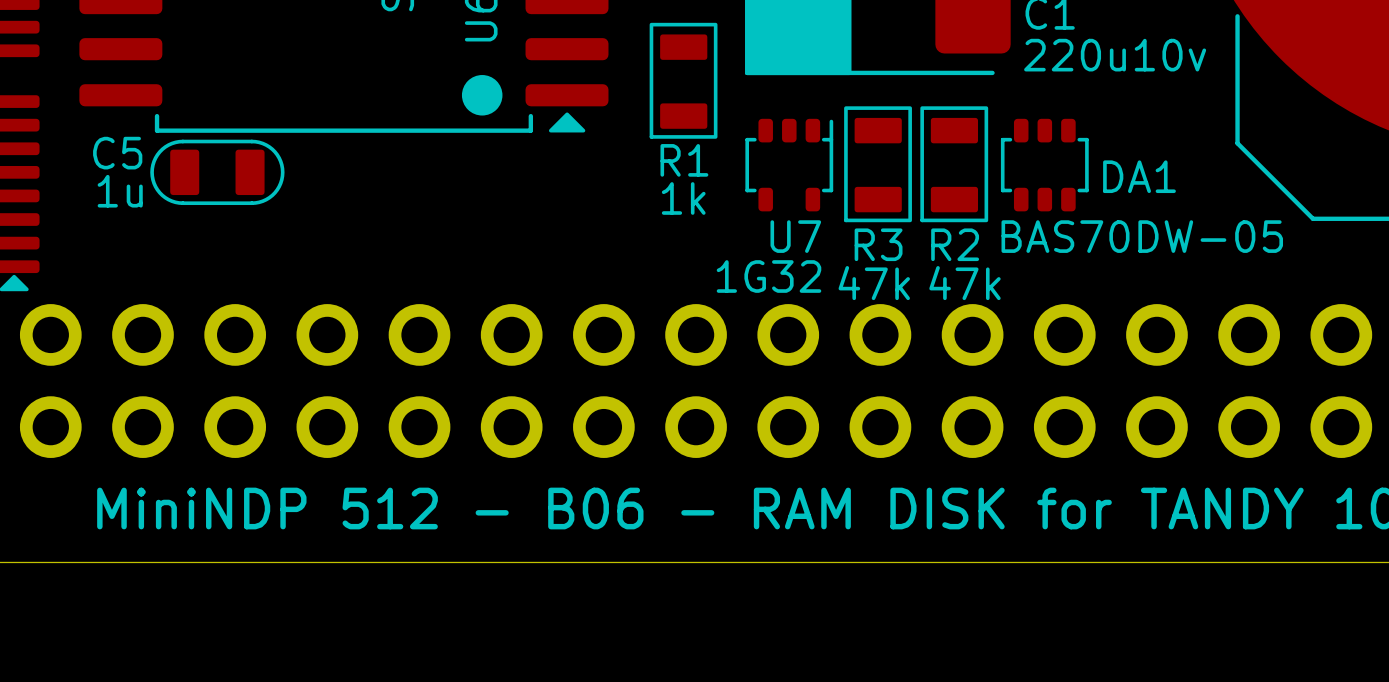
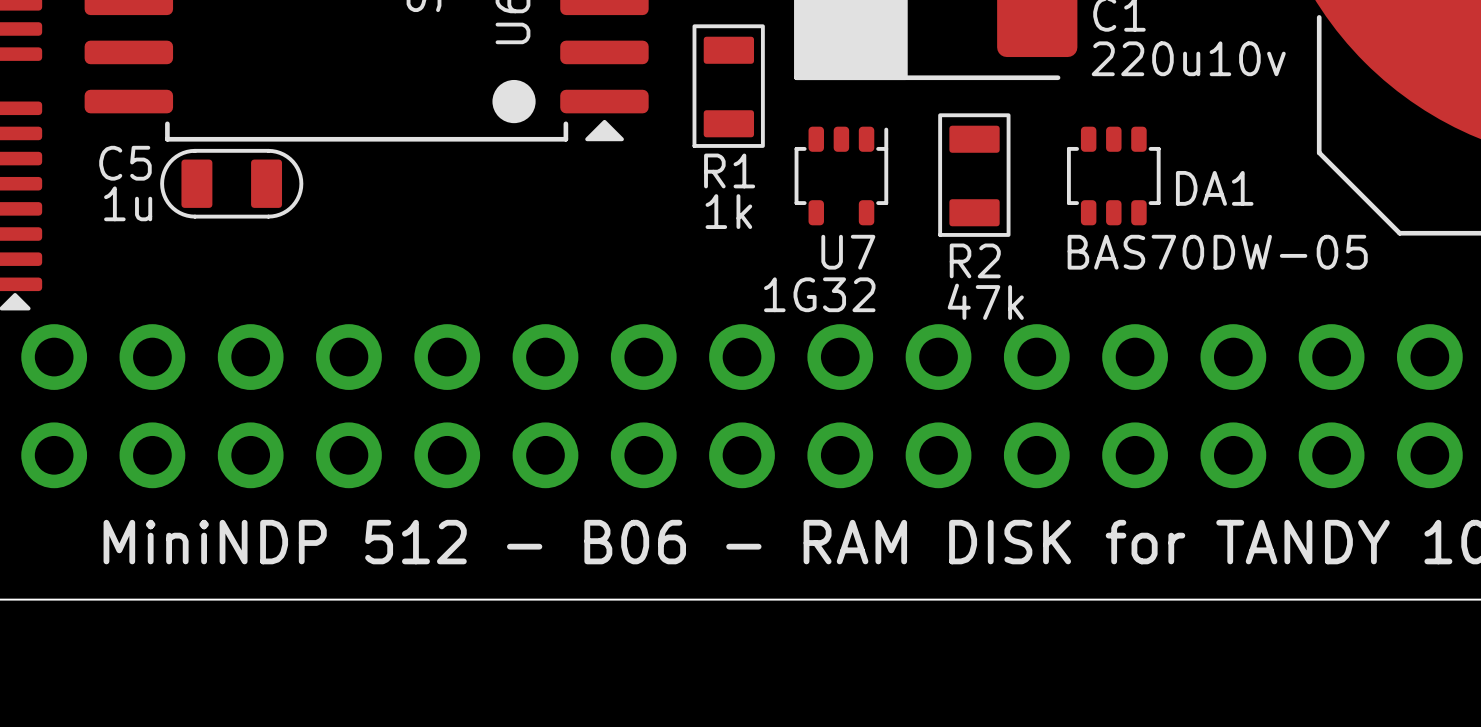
R3: 47k (878, 164) -> none
R2 position: (954, 164) -> (974, 175)

